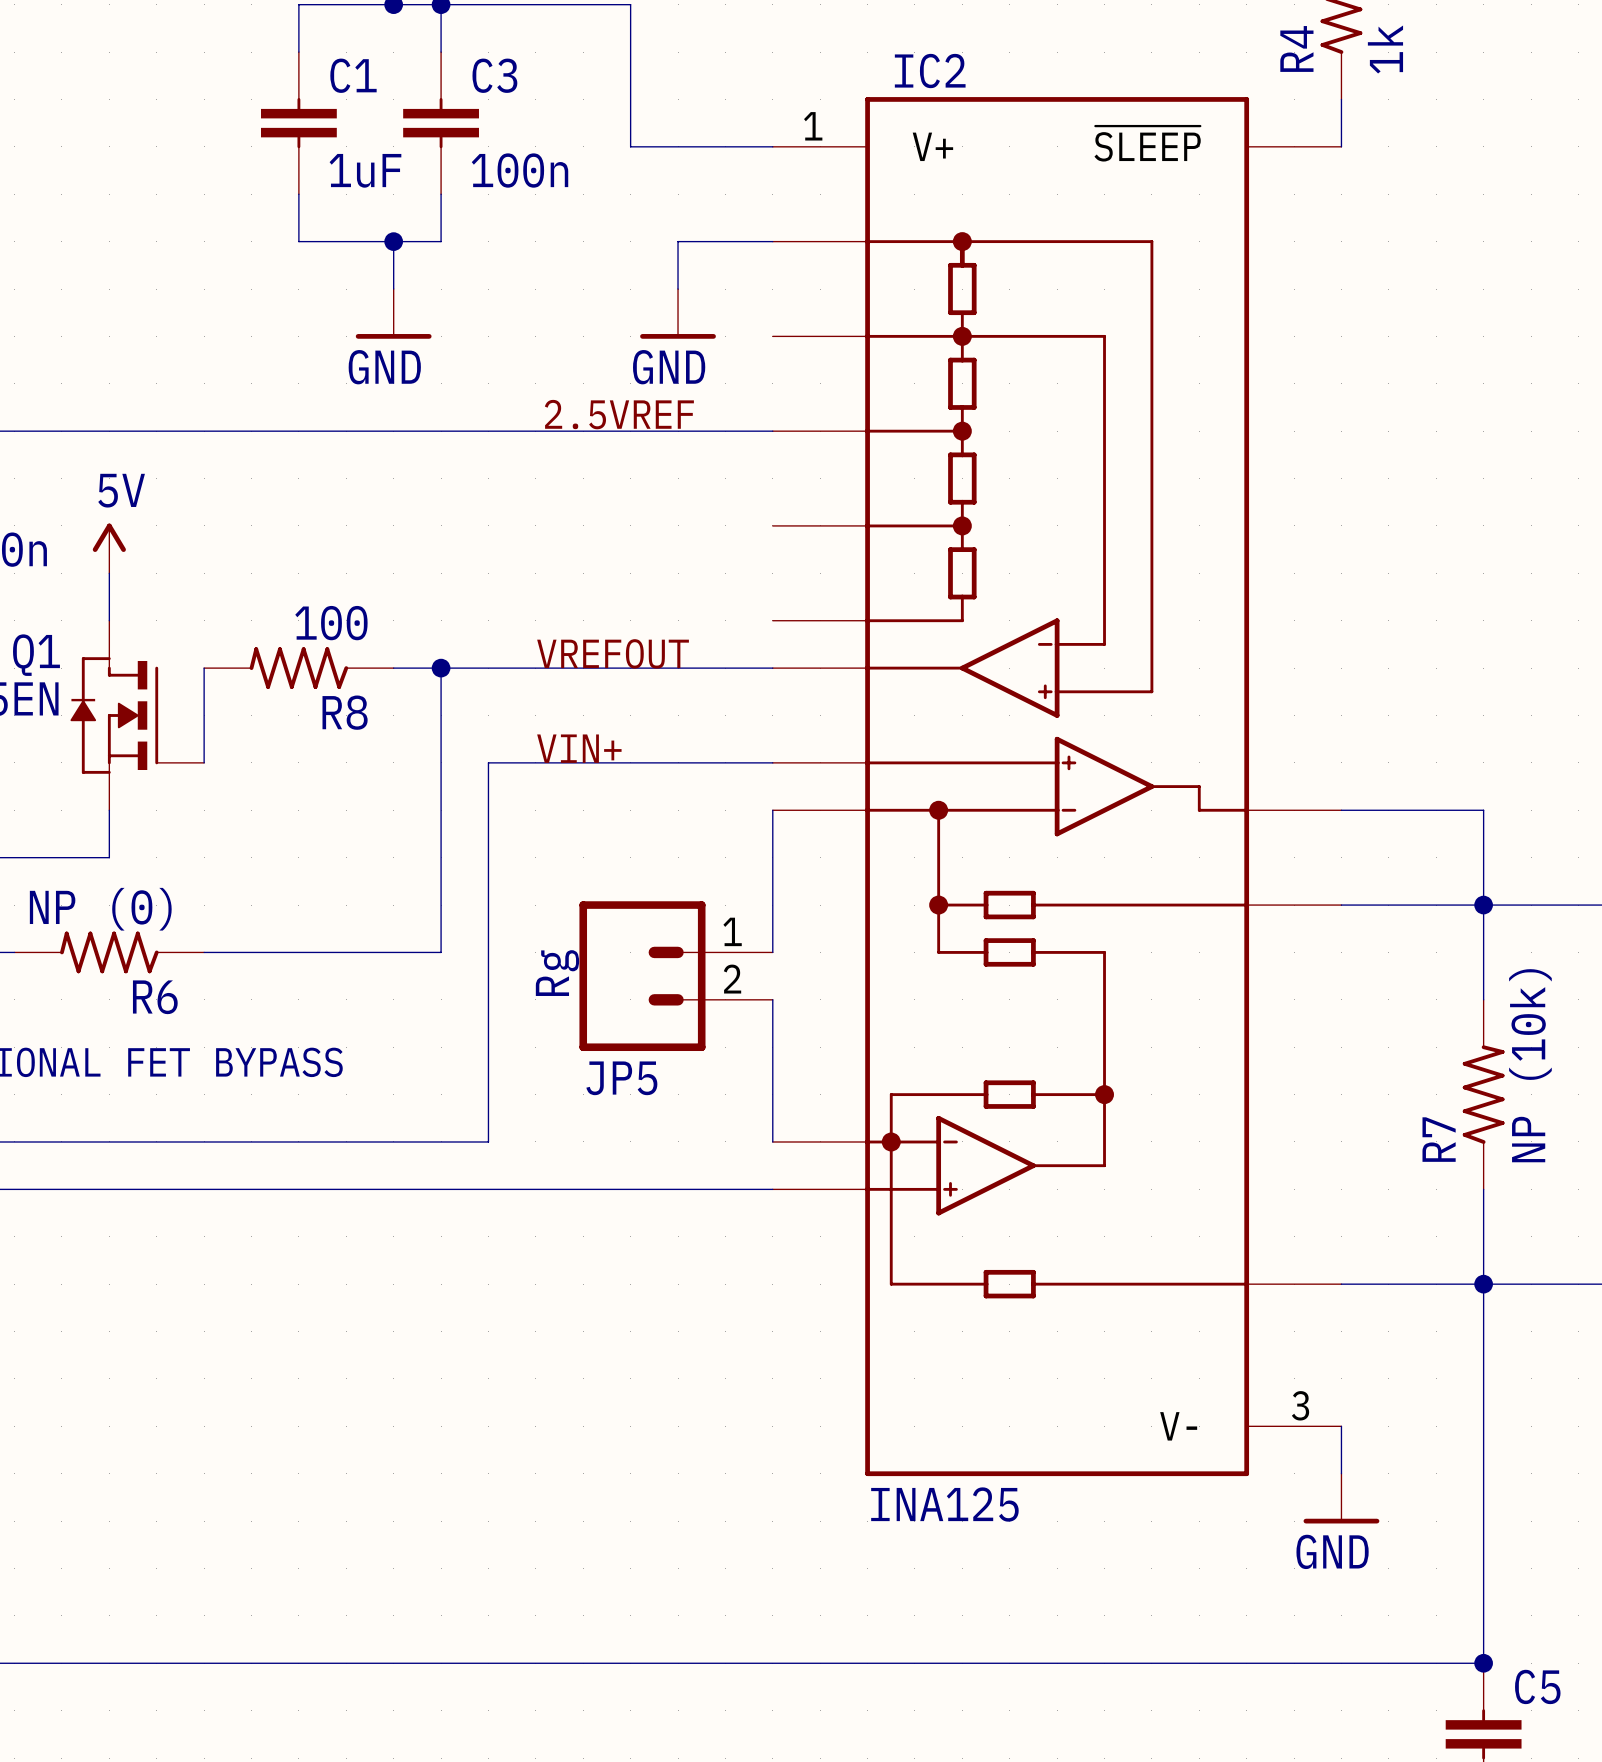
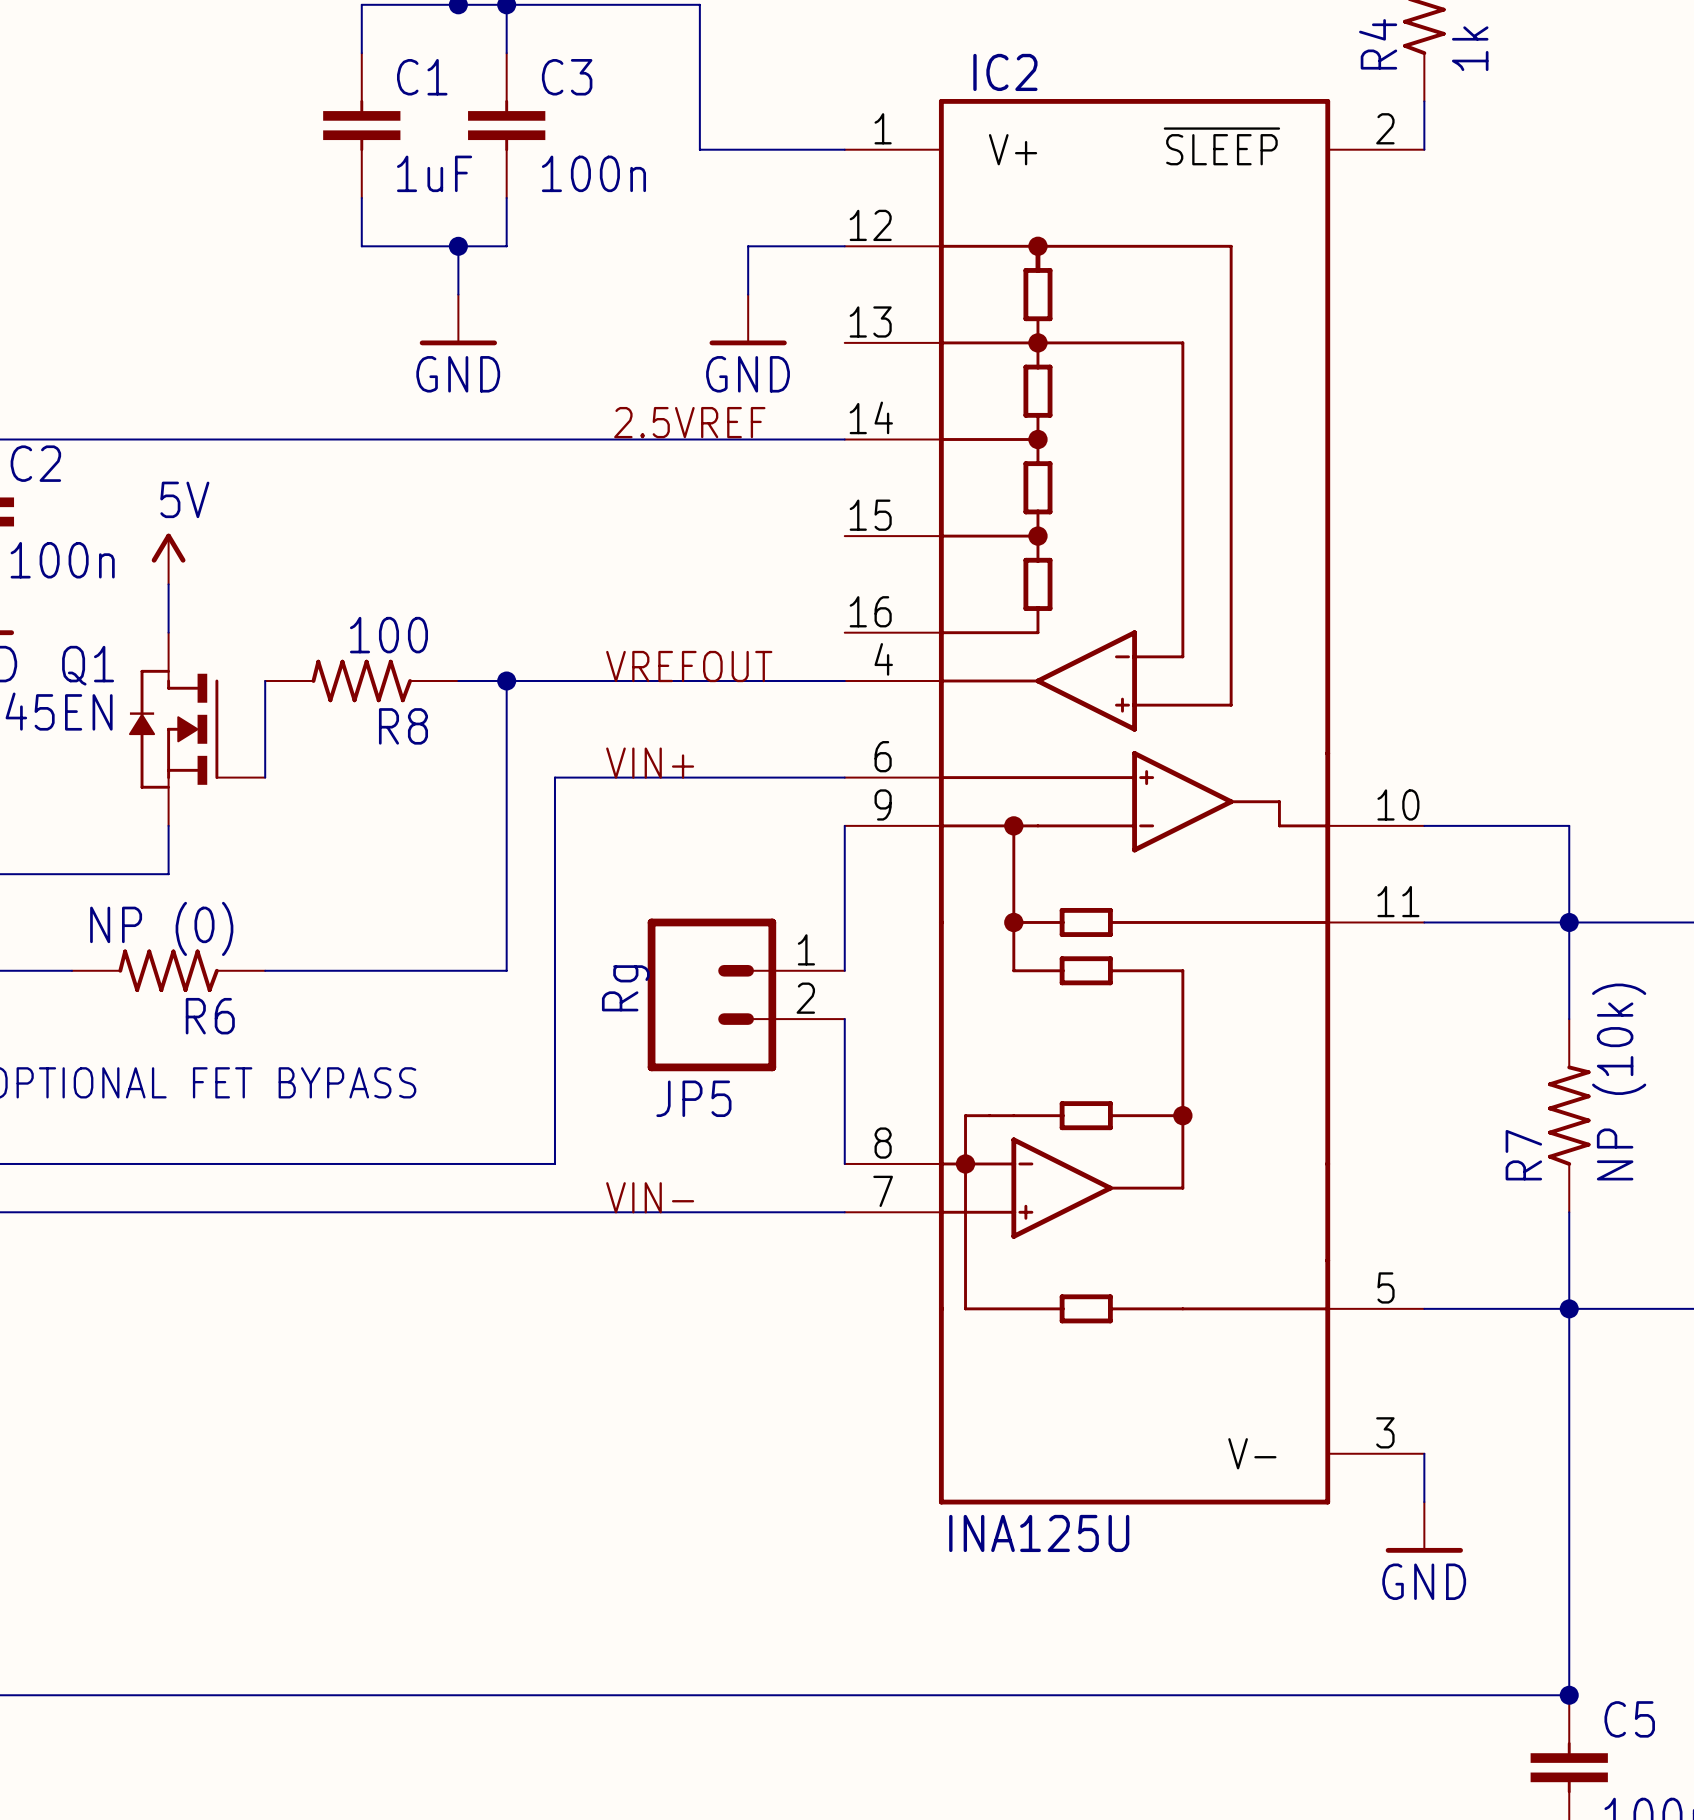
IC2 symbol: [772, 97, 1342, 1477] -> [844, 99, 1425, 1505]
label: none -> VIN- (650, 1197)
IC2 value: INA125 (944, 1504) -> INA125U (1039, 1533)

